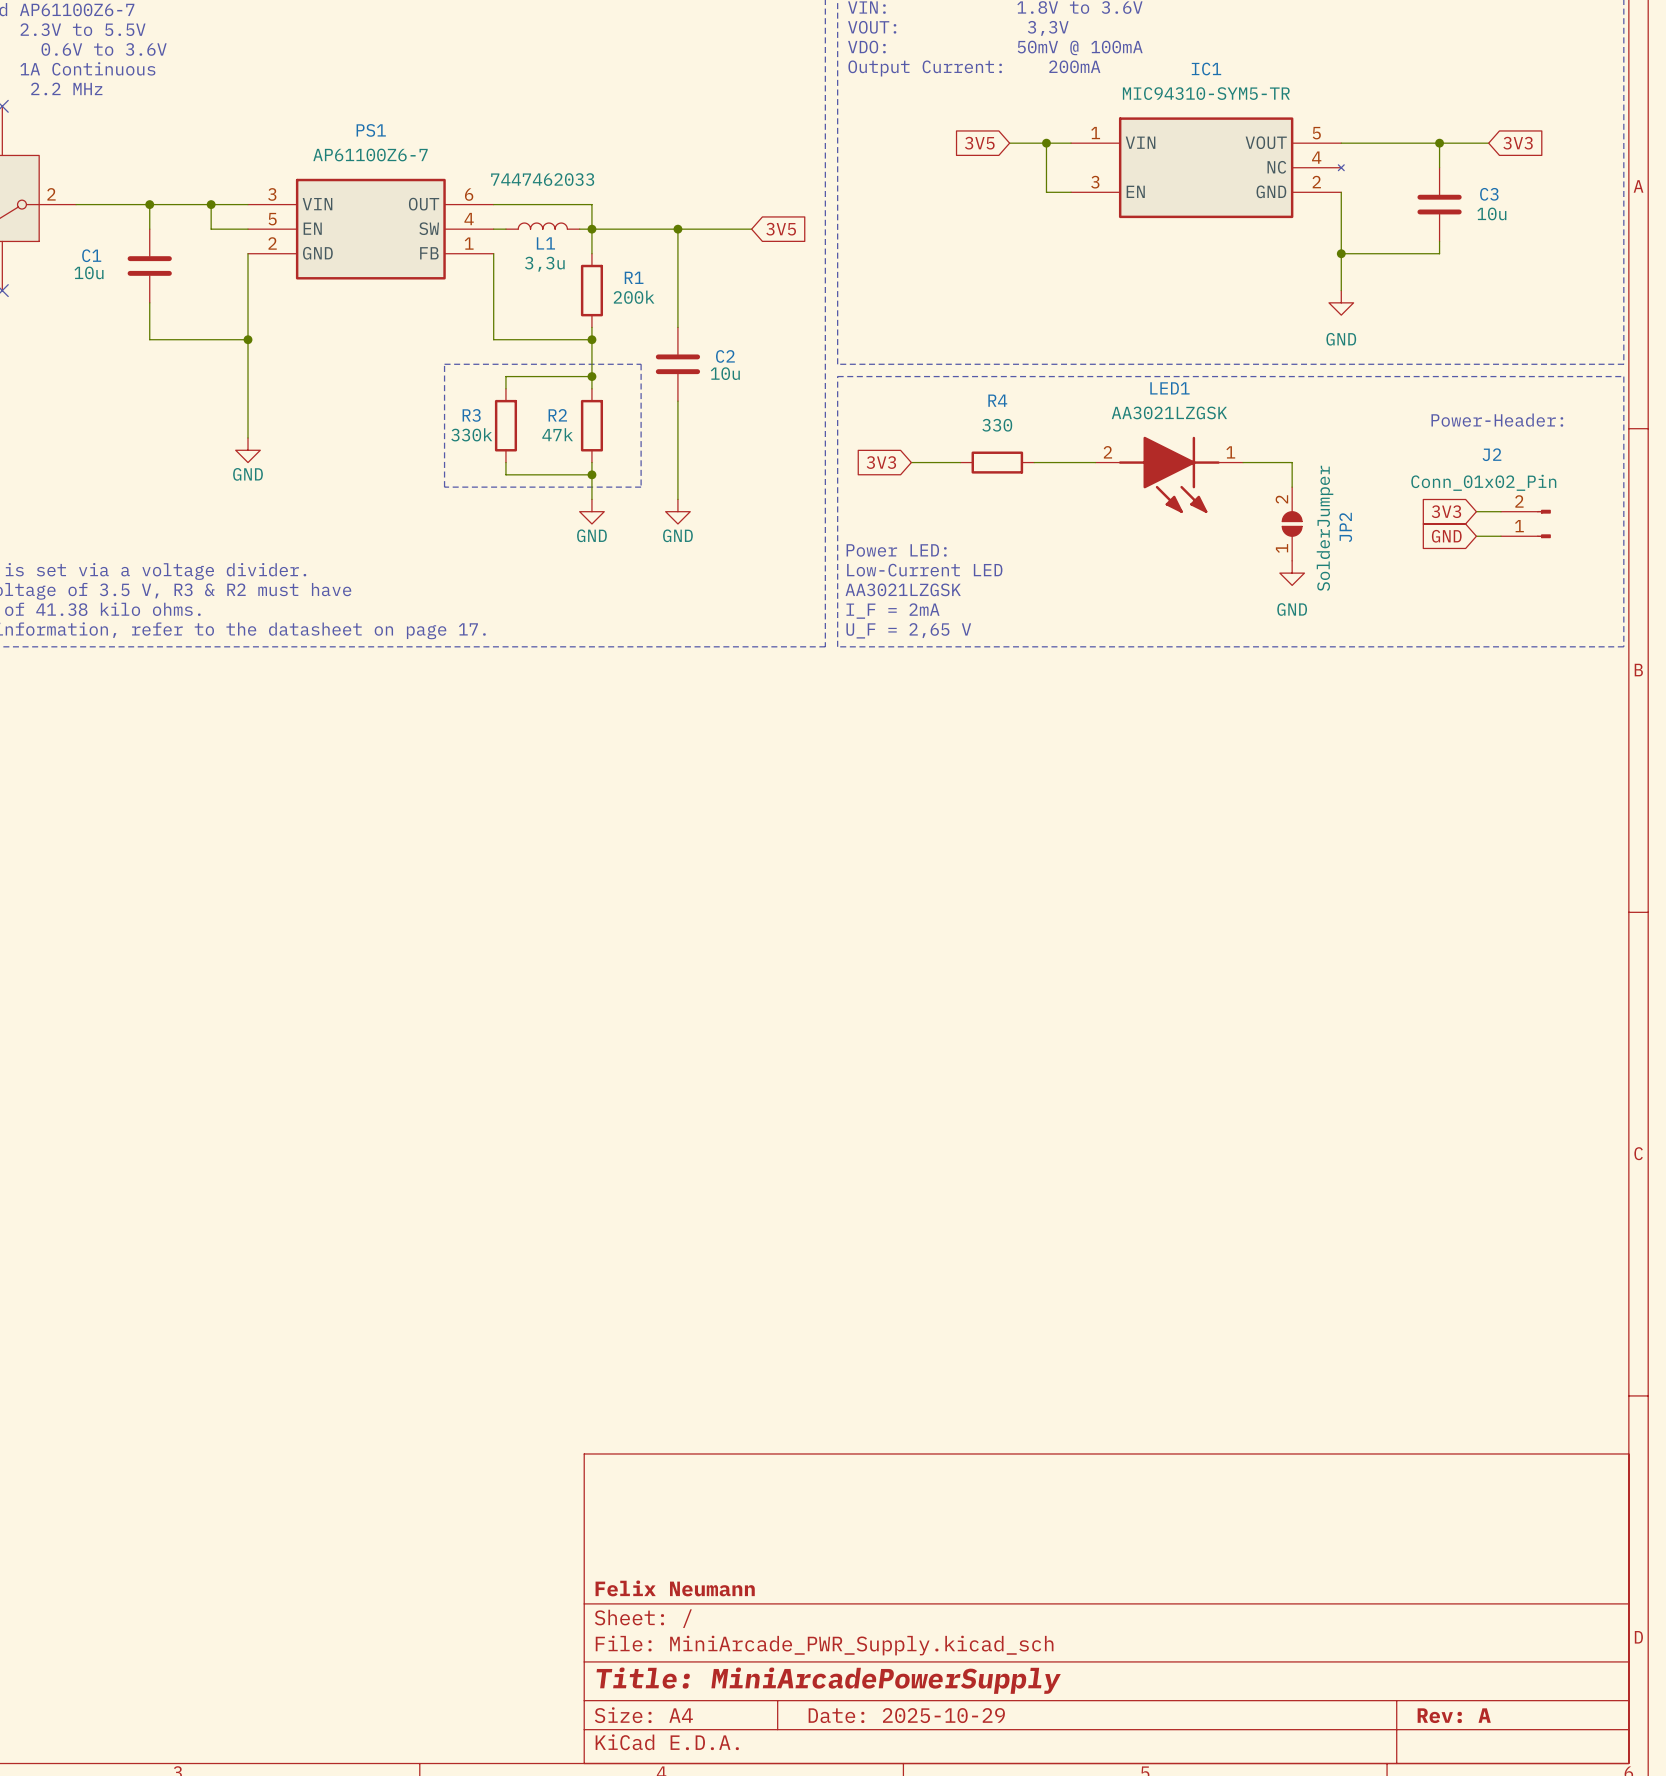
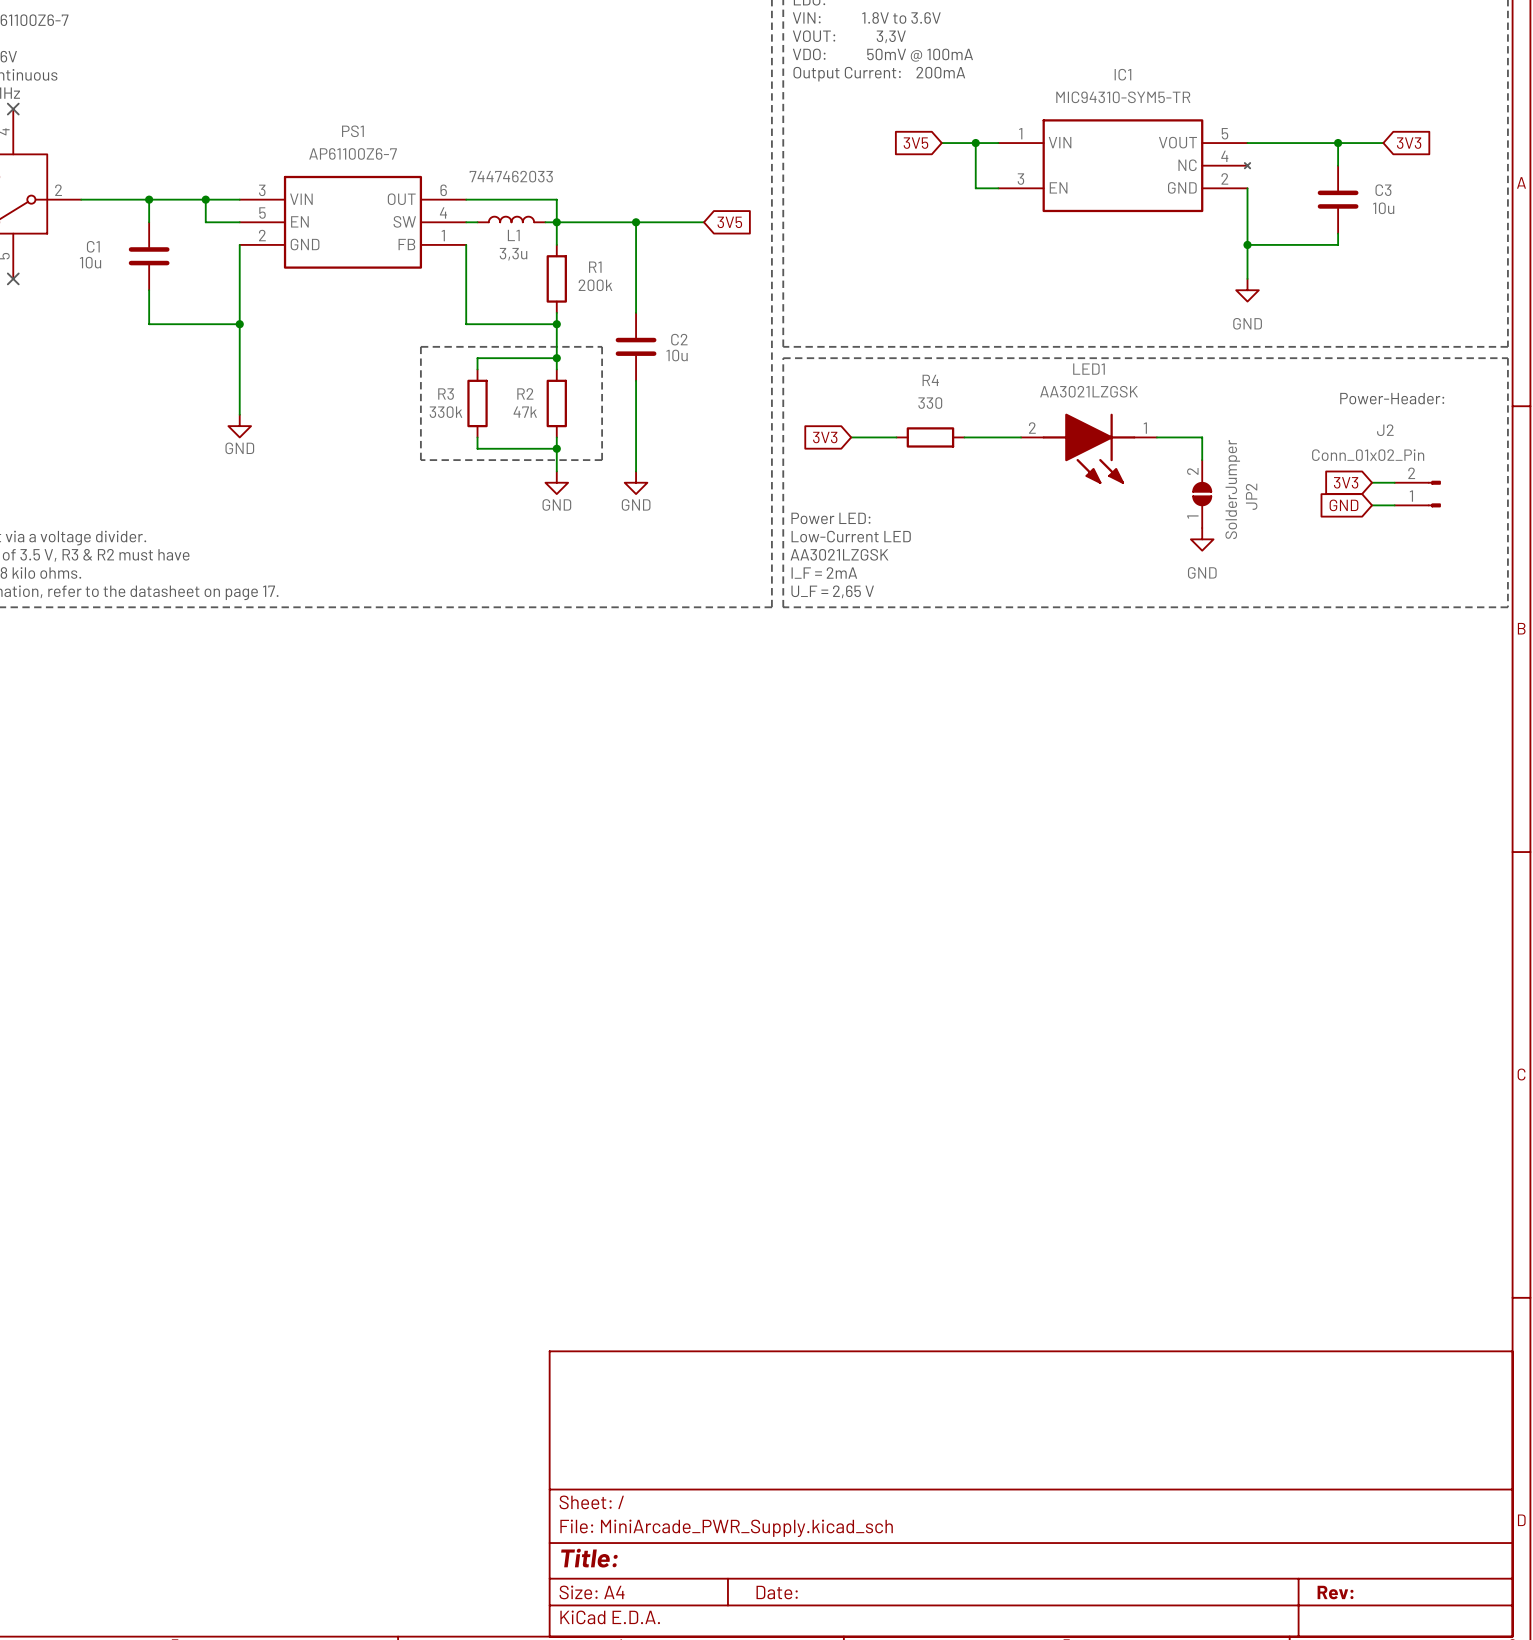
title block: Felix Neumann (675, 1588) -> none
title block: Title: MiniArcadePowerSupply (828, 1680) -> Title: (589, 1558)
title block: Date: 2025-10-29 (906, 1715) -> Date: (777, 1592)
title block: Rev: A (1454, 1715) -> Rev: (1335, 1592)

